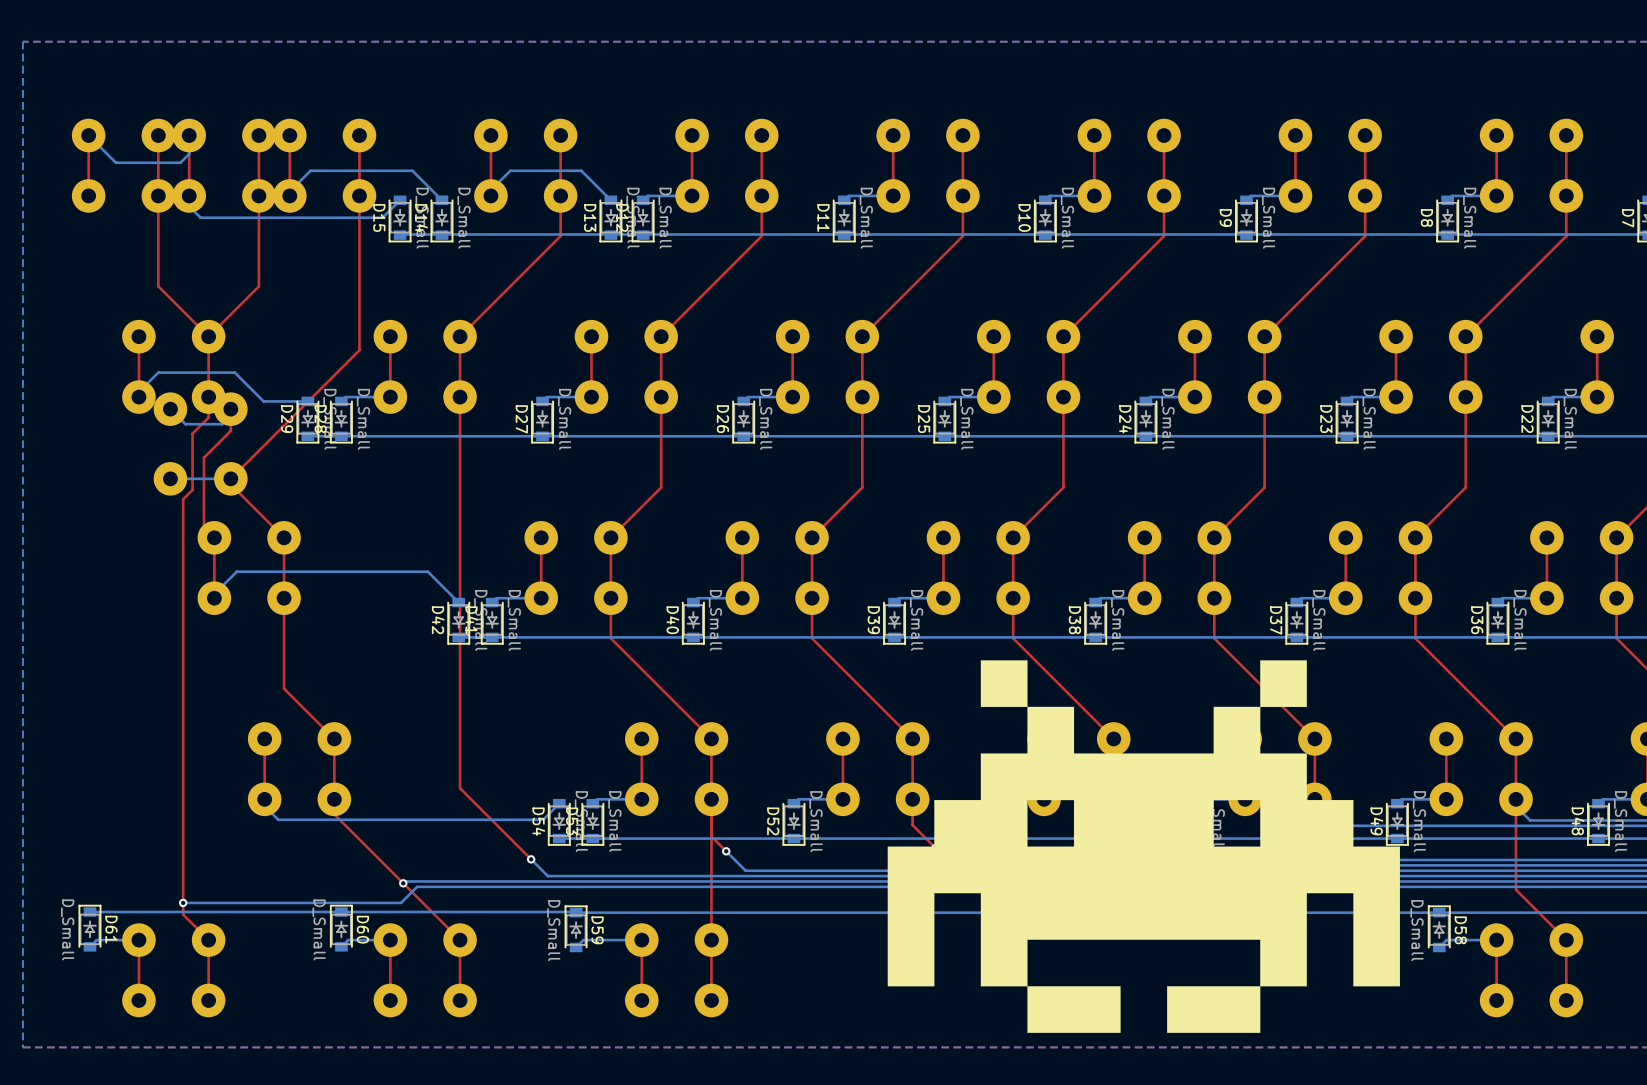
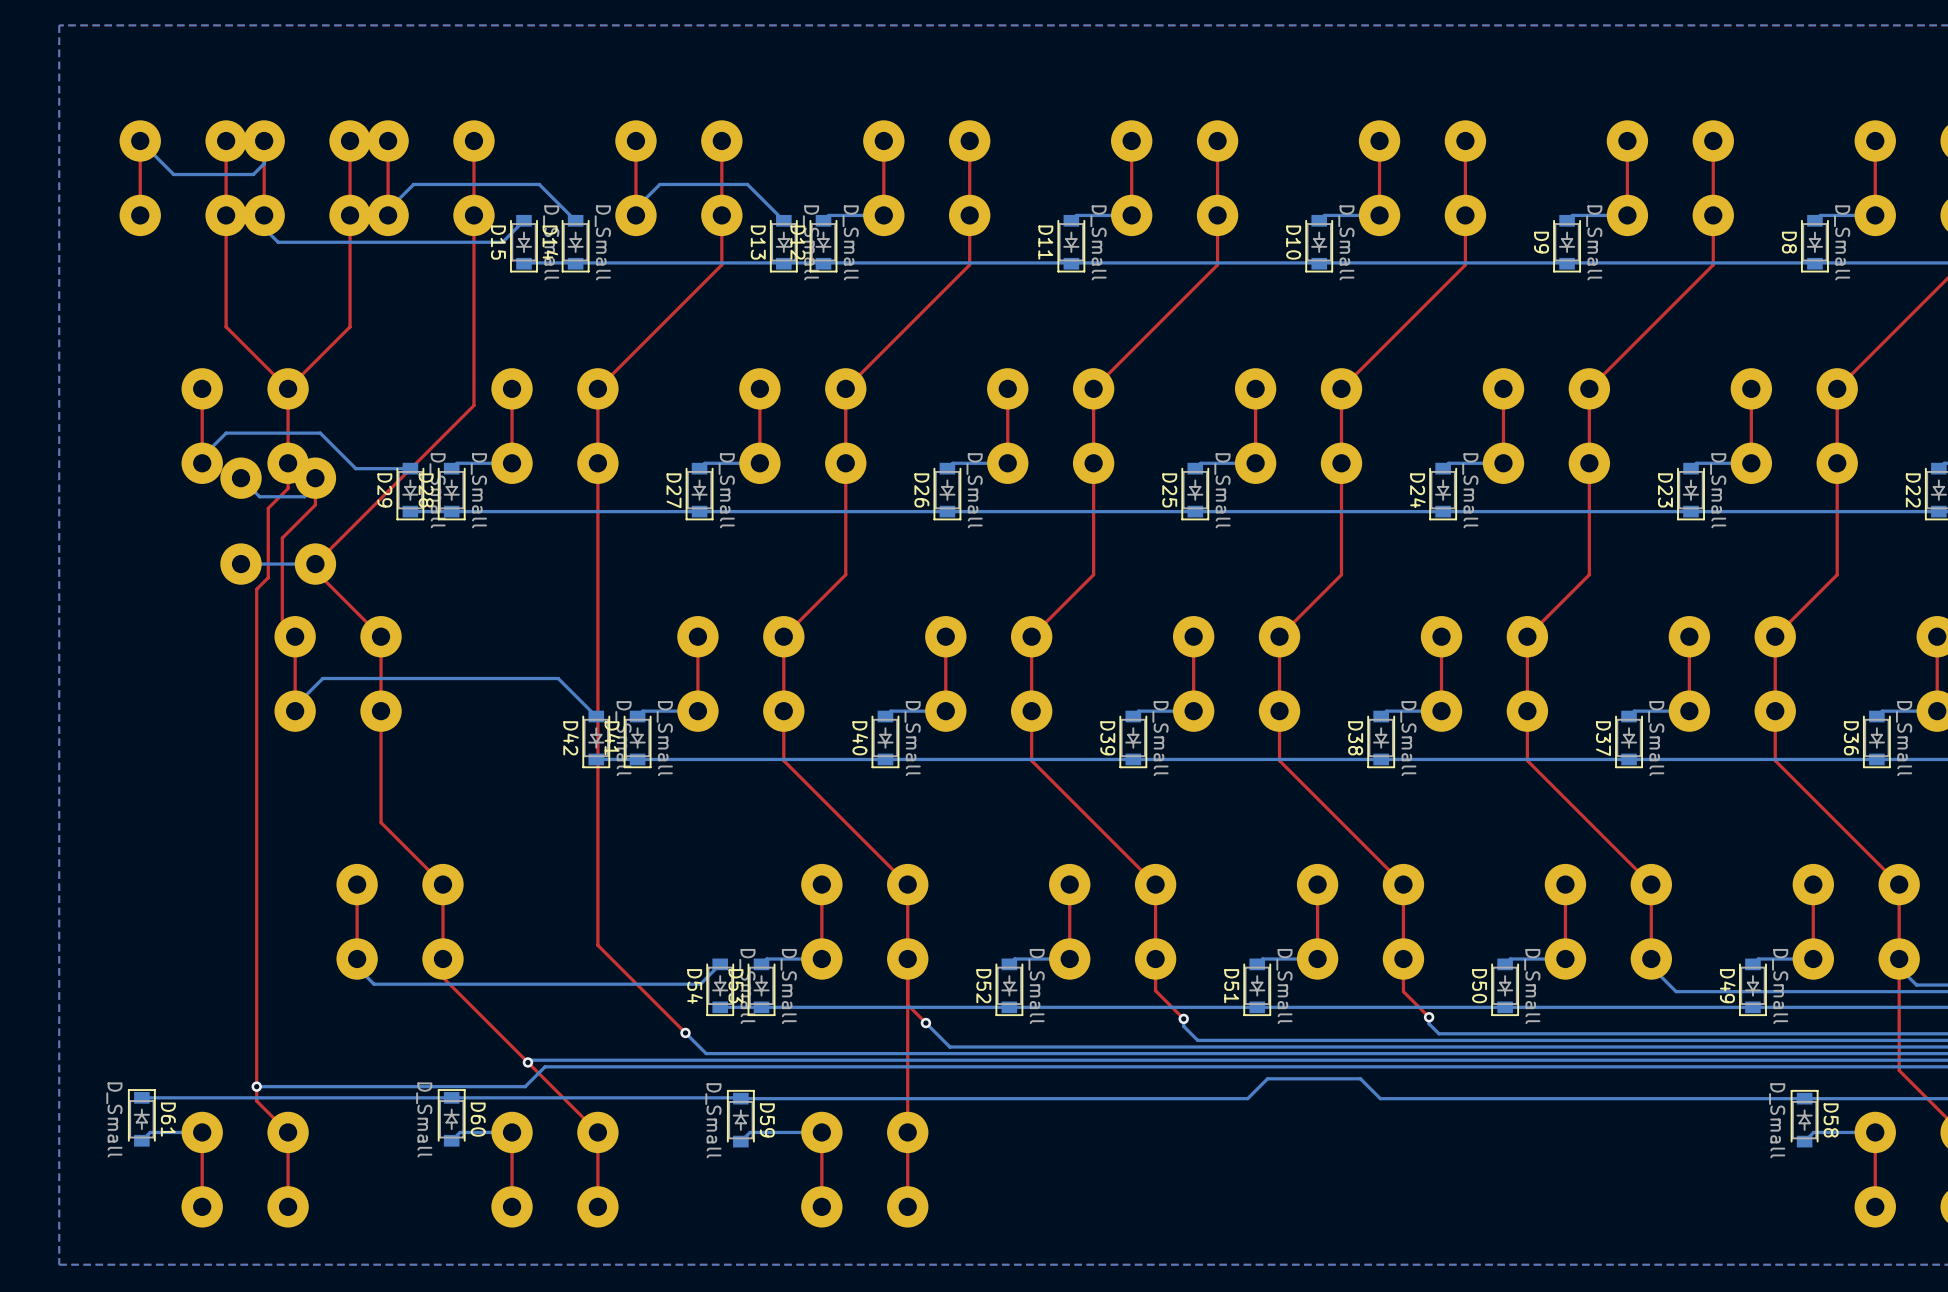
drawing: [887, 660, 1400, 1033] -> none

